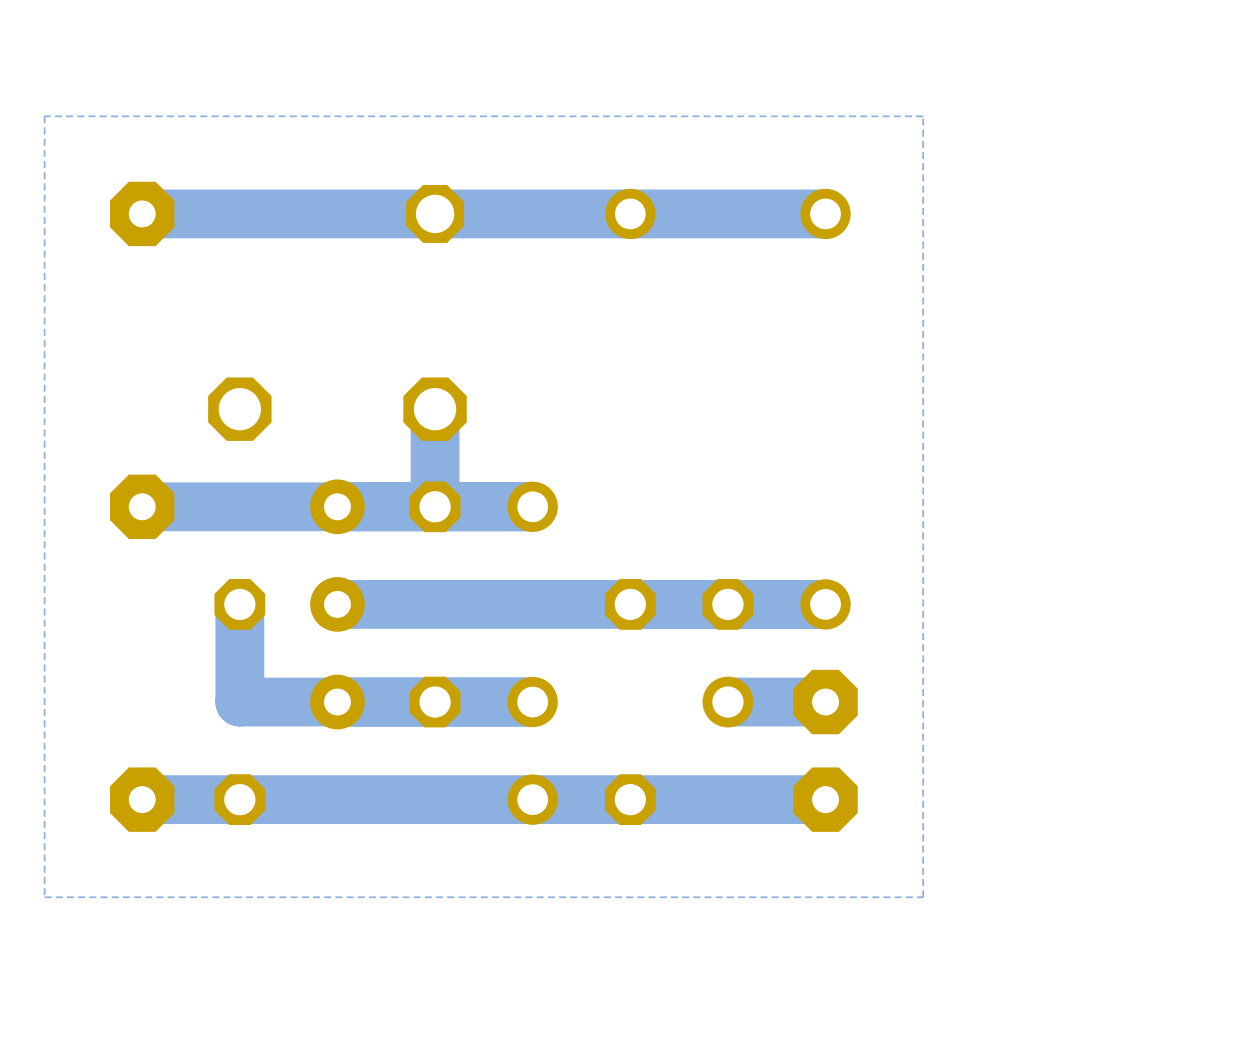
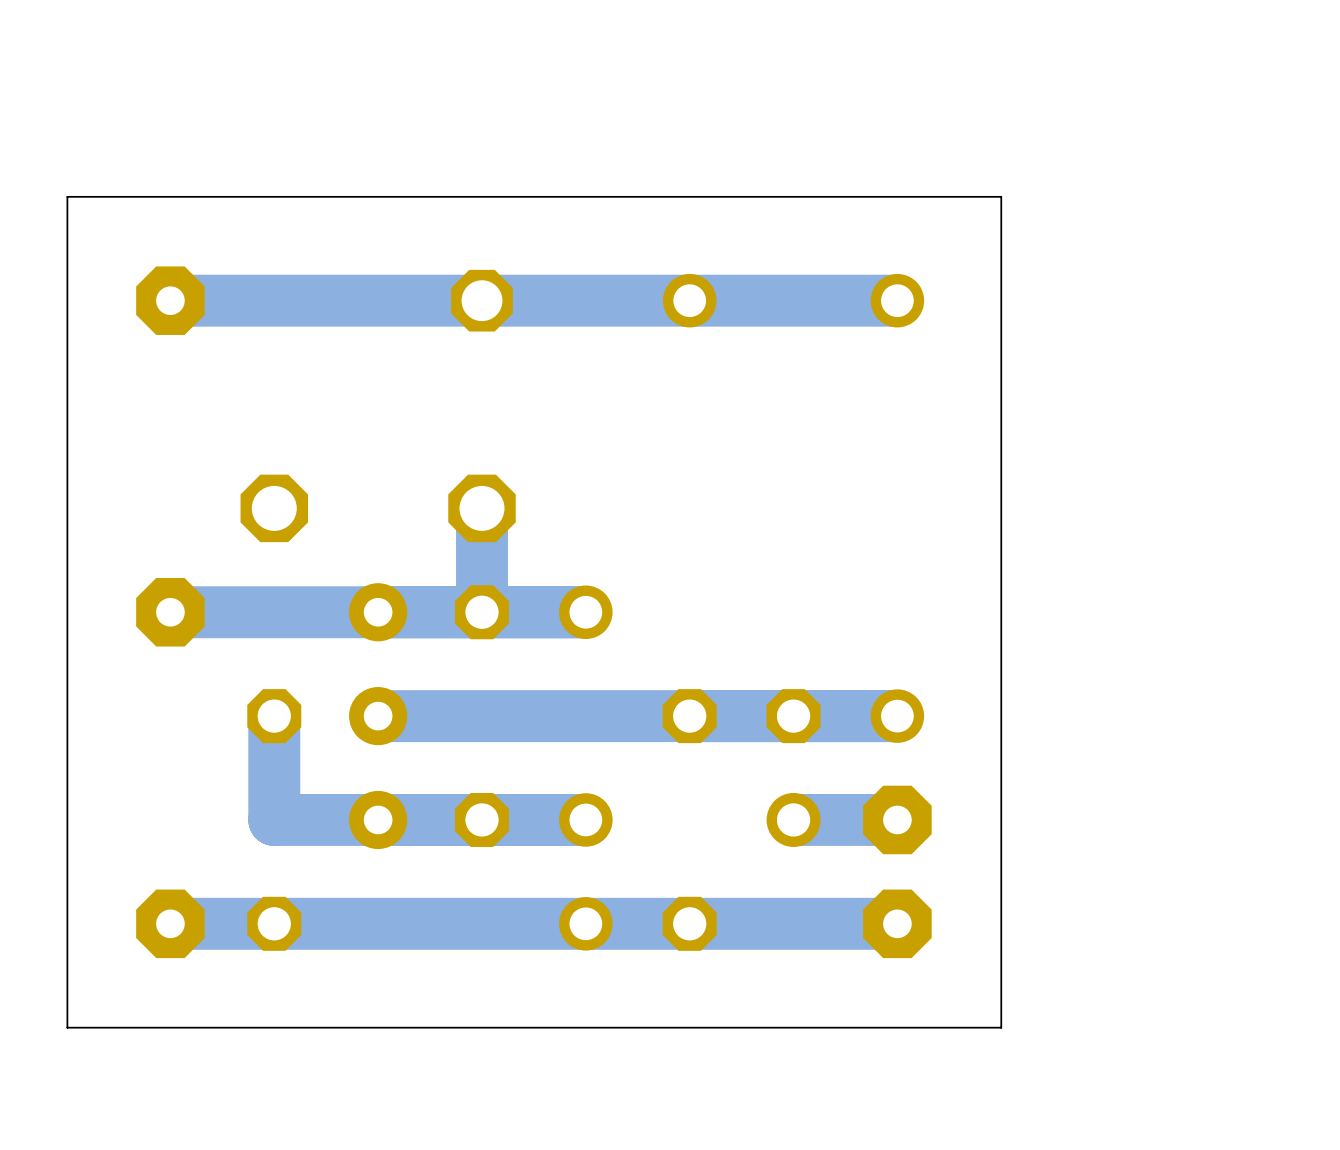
bottom zone outline: (923, 116) (923, 897) (44, 897) (44, 116) (923, 116) -> none
board edge: none -> (1001, 196) (67, 196) (67, 1027) (1001, 1027) (1001, 196)

